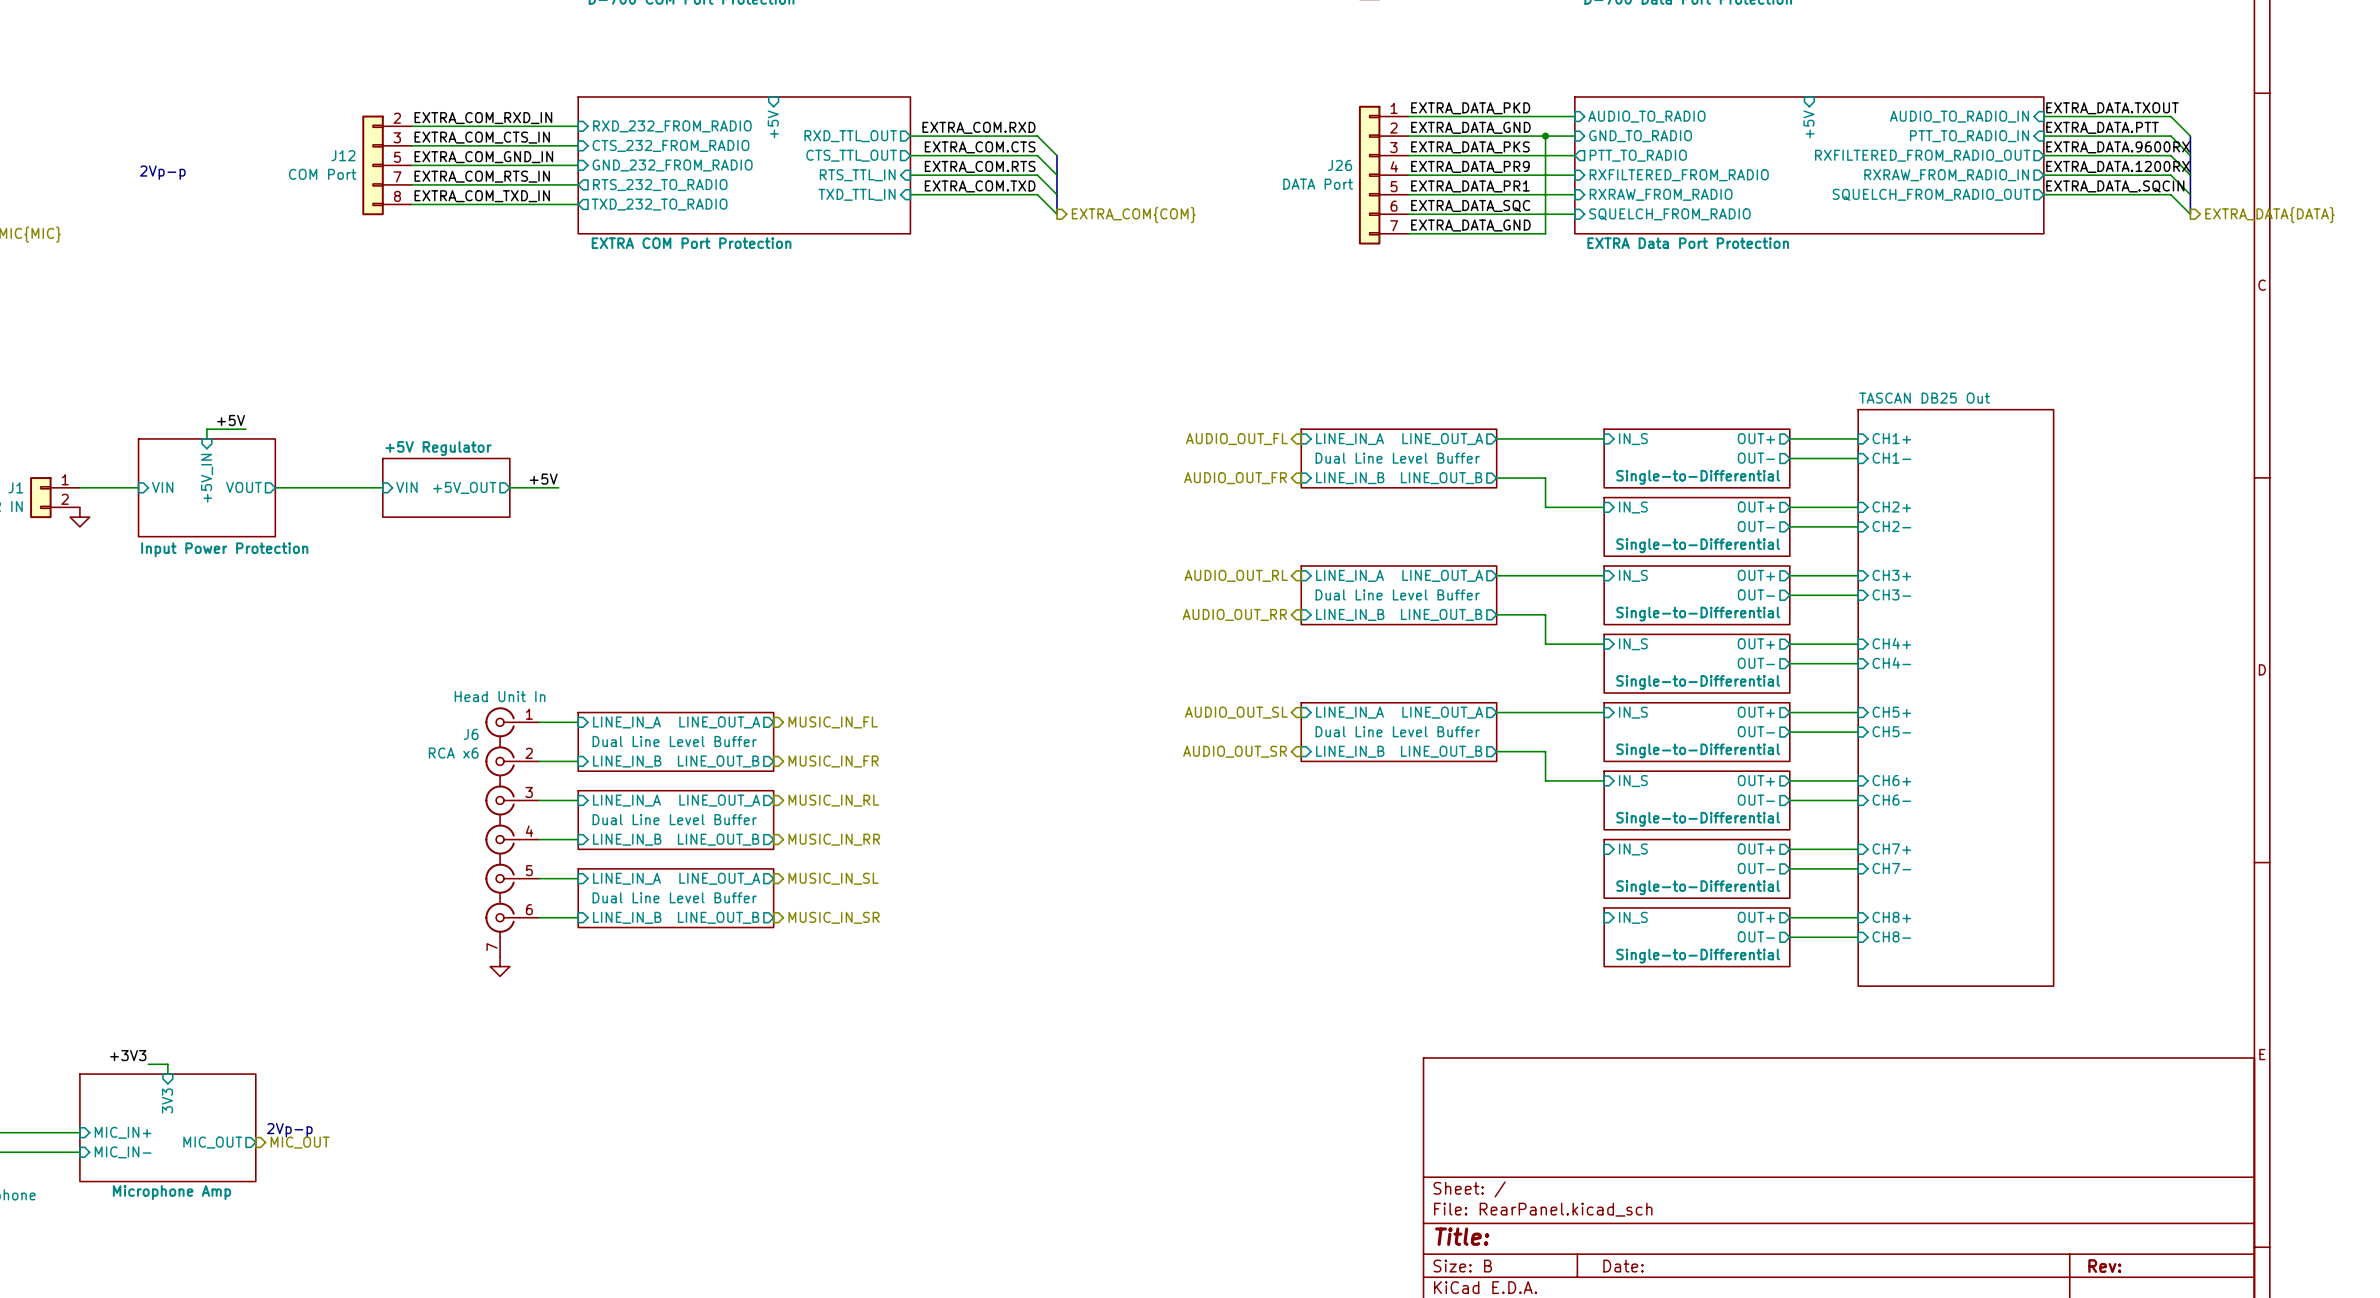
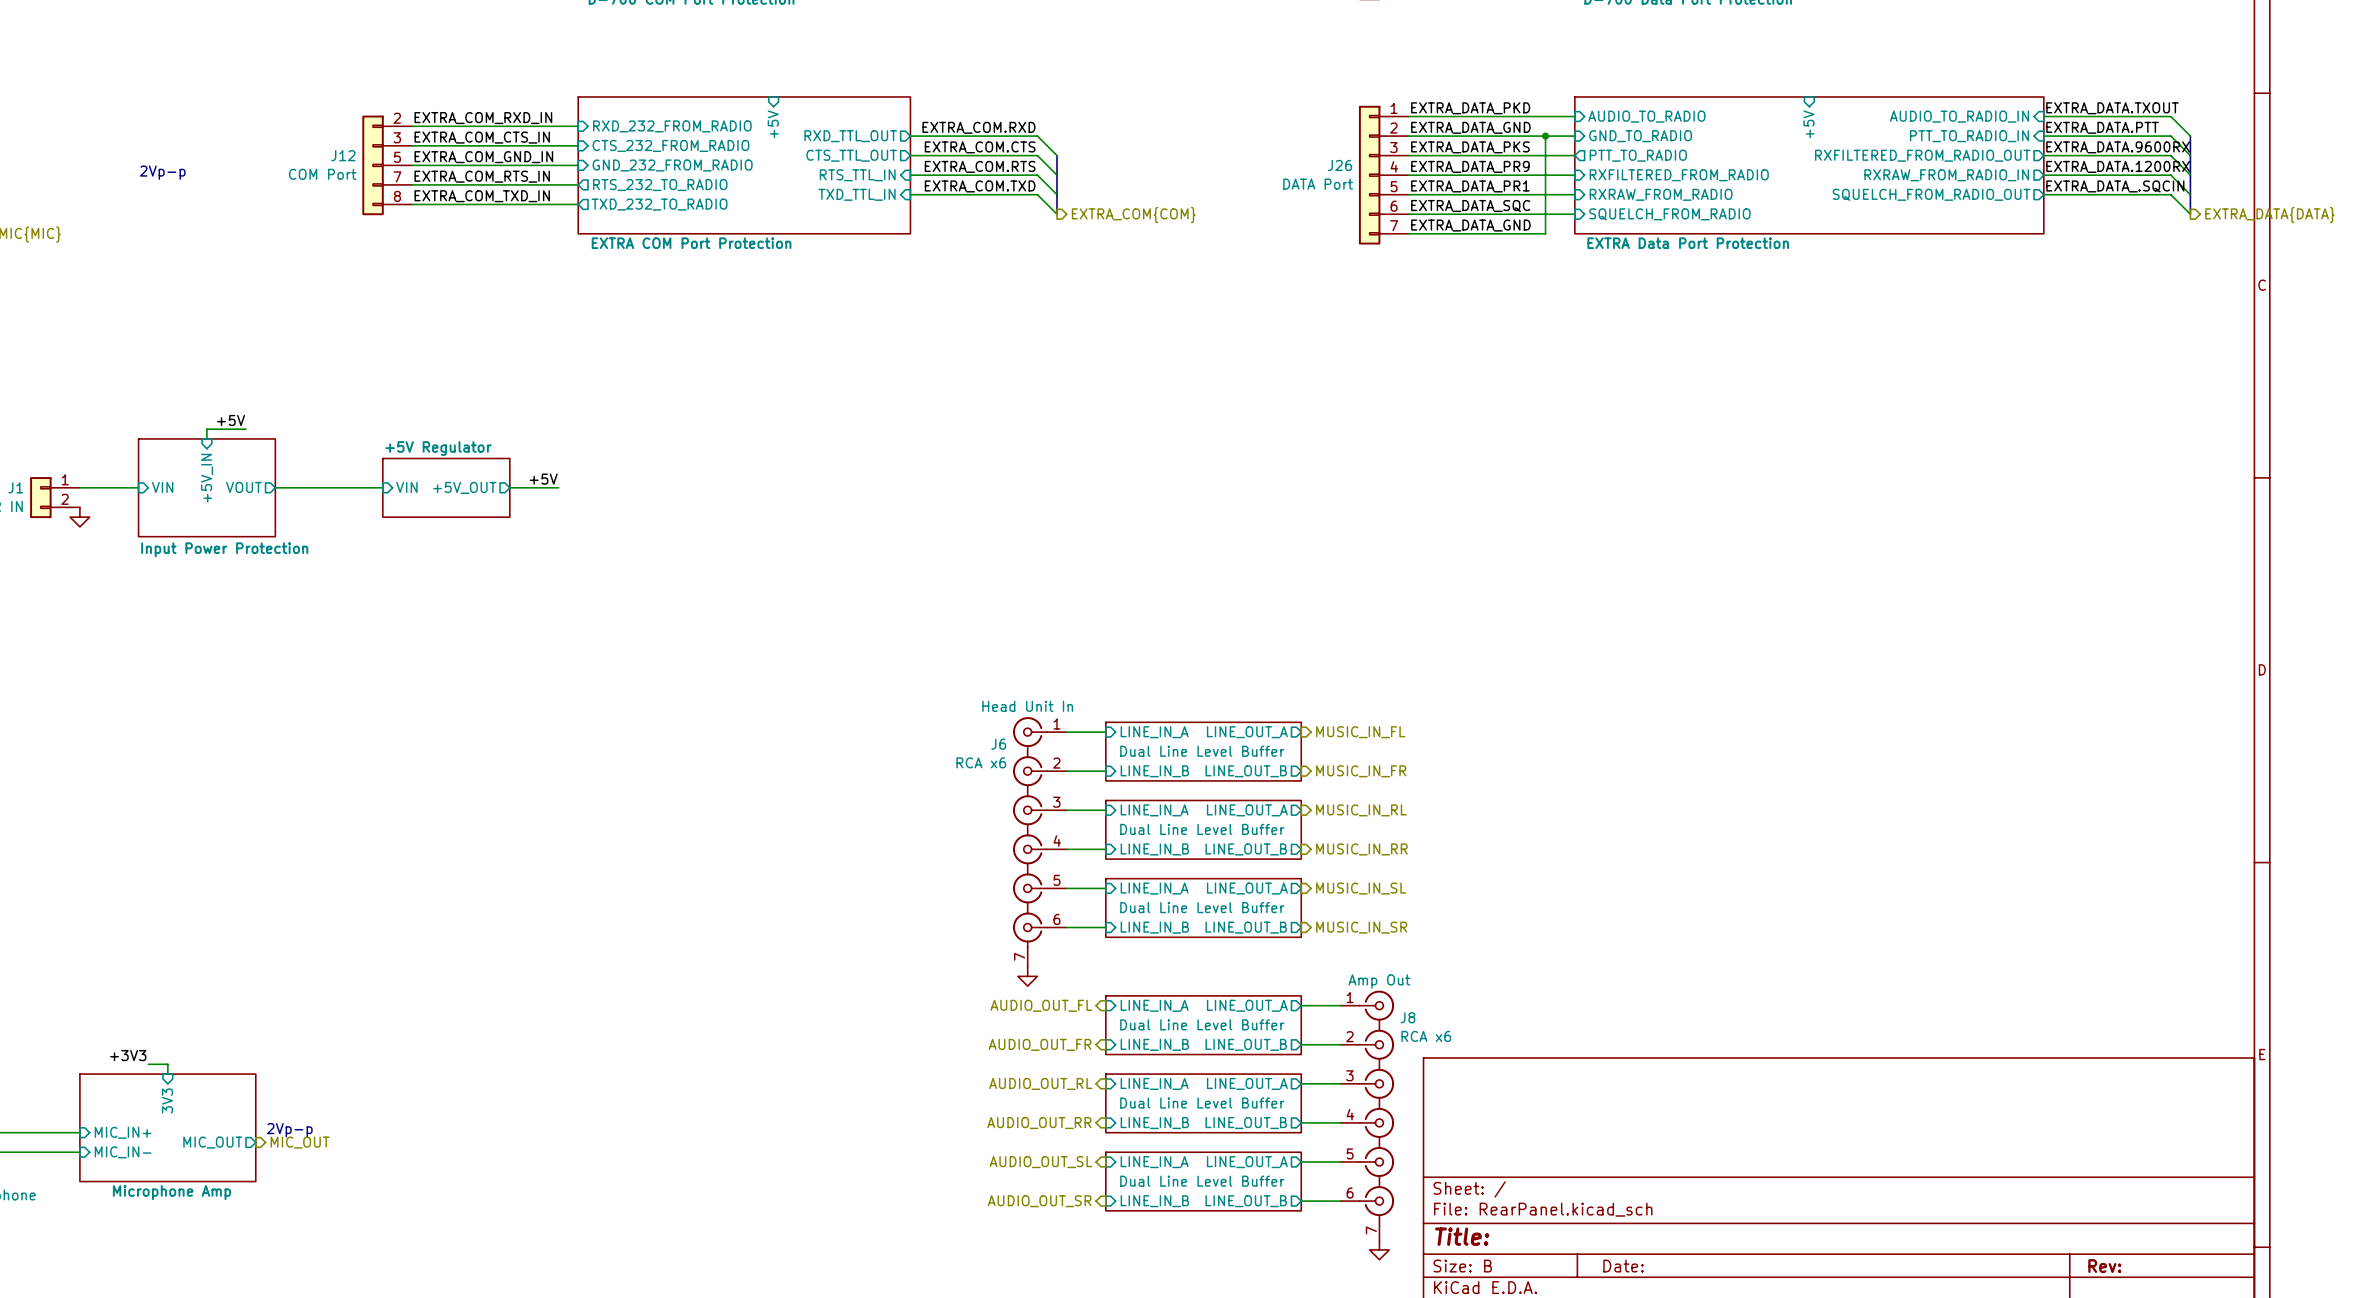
wire: (1496, 438) (1604, 438) -> none
sheet pin: OUT+ (1756, 438) -> none
wire: (1789, 438) (1858, 438) -> none
sheet pin: CH1+ (1891, 438) -> none
hierarchical label: AUDIO_OUT_FL (1236, 439) -> none
sheet pin: LINE_IN_A (1350, 439) -> none
sheet pin: LINE_OUT_A (1442, 439) -> none
sheet pin: IN_S (1633, 439) -> none
sheet Dual Line Level Buffer: (1398, 458) -> none
sheet Single-to-Differential: (1696, 458) -> none
sheet pin: OUT- (1756, 458) -> none
wire: (1789, 458) (1858, 458) -> none
sheet pin: CH1- (1891, 458) -> none
hierarchical label: AUDIO_OUT_FR (1235, 478) -> none
sheet pin: LINE_IN_B (1350, 478) -> none
sheet pin: LINE_OUT_B (1441, 478) -> none
wire: (1496, 478) (1545, 478) (1545, 507) (1604, 507) -> none
sheet pin: IN_S (1633, 507) -> none
sheet pin: OUT+ (1756, 507) -> none
wire: (1789, 507) (1858, 507) -> none
sheet pin: CH2+ (1891, 507) -> none
sheet Single-to-Differential: (1696, 526) -> none
sheet pin: OUT- (1756, 526) -> none
wire: (1789, 526) (1858, 526) -> none
sheet pin: CH2- (1891, 526) -> none
hierarchical label: AUDIO_OUT_RL (1236, 575) -> none
sheet pin: LINE_IN_A (1350, 575) -> none
sheet pin: LINE_OUT_A (1442, 575) -> none
wire: (1496, 575) (1604, 575) -> none
sheet pin: IN_S (1633, 575) -> none
sheet pin: OUT+ (1756, 575) -> none
wire: (1789, 575) (1858, 575) -> none
sheet pin: CH3+ (1891, 575) -> none
sheet pin: OUT- (1756, 594) -> none
sheet pin: CH3- (1891, 594) -> none
sheet Dual Line Level Buffer: (1398, 595) -> none
sheet Single-to-Differential: (1696, 595) -> none
wire: (1789, 595) (1858, 595) -> none
hierarchical label: AUDIO_OUT_RR (1234, 614) -> none
sheet pin: LINE_IN_B (1350, 614) -> none
sheet pin: LINE_OUT_B (1441, 614) -> none
wire: (1496, 614) (1545, 614) (1545, 644) (1604, 644) -> none
sheet pin: OUT+ (1756, 643) -> none
sheet pin: CH4+ (1891, 643) -> none
sheet pin: IN_S (1633, 644) -> none
wire: (1789, 644) (1858, 644) -> none
sheet Single-to-Differential: (1696, 663) -> none
sheet pin: OUT- (1756, 663) -> none
wire: (1789, 663) (1858, 663) -> none
sheet pin: CH4- (1891, 663) -> none
sheet TASCAN DB25 Out: (1955, 697) -> none
hierarchical label: AUDIO_OUT_SL (1236, 712) -> none
sheet pin: LINE_IN_A (1350, 712) -> none
sheet pin: LINE_OUT_A (1442, 712) -> none
wire: (1496, 712) (1604, 712) -> none
sheet pin: IN_S (1633, 712) -> none
sheet pin: OUT+ (1756, 712) -> none
wire: (1789, 712) (1858, 712) -> none
sheet pin: CH5+ (1891, 712) -> none
wire: (539, 722) (578, 722) -> none
sheet pin: LINE_IN_A (627, 722) -> none
sheet pin: LINE_OUT_A (719, 722) -> none
hierarchical label: MUSIC_IN_FL (833, 722) -> none
sheet pin: OUT- (1756, 731) -> none
sheet pin: CH5- (1891, 731) -> none
wire: none -> (1066, 732) (1105, 732)
sheet pin: none -> LINE_IN_A (1154, 732)
sheet pin: none -> LINE_OUT_A (1247, 732)
hierarchical label: none -> MUSIC_IN_FL (1360, 732)
sheet Dual Line Level Buffer: (1398, 732) -> none
sheet Single-to-Differential: (1696, 732) -> none
wire: (1789, 732) (1858, 732) -> none
sheet Dual Line Level Buffer: (675, 741) -> none
sheet Dual Line Level Buffer: none -> (1203, 751)
hierarchical label: AUDIO_OUT_SR (1235, 751) -> none
sheet pin: LINE_IN_B (1350, 751) -> none
sheet pin: LINE_OUT_B (1441, 751) -> none
wire: (1496, 751) (1545, 751) (1545, 780) (1604, 780) -> none
wire: (539, 761) (578, 761) -> none
sheet pin: LINE_IN_B (627, 761) -> none
sheet pin: LINE_OUT_B (718, 761) -> none
hierarchical label: MUSIC_IN_FR (833, 761) -> none
wire: none -> (1066, 771) (1105, 771)
sheet pin: none -> LINE_IN_B (1154, 771)
sheet pin: none -> LINE_OUT_B (1246, 771)
hierarchical label: none -> MUSIC_IN_FR (1361, 771)
sheet pin: OUT+ (1756, 780) -> none
wire: (1789, 780) (1858, 780) -> none
sheet pin: CH6+ (1891, 780) -> none
sheet pin: IN_S (1633, 781) -> none
wire: (539, 800) (578, 800) -> none
sheet pin: LINE_IN_A (627, 800) -> none
sheet pin: LINE_OUT_A (719, 800) -> none
hierarchical label: MUSIC_IN_RL (833, 800) -> none
sheet Single-to-Differential: (1696, 800) -> none
sheet pin: OUT- (1756, 800) -> none
wire: (1789, 800) (1858, 800) -> none
sheet pin: CH6- (1891, 800) -> none
wire: none -> (1066, 810) (1105, 810)
sheet pin: none -> LINE_IN_A (1154, 810)
sheet pin: none -> LINE_OUT_A (1247, 810)
hierarchical label: none -> MUSIC_IN_RL (1361, 810)
sheet Dual Line Level Buffer: (675, 820) -> none
sheet Dual Line Level Buffer: none -> (1203, 829)
J6 position: (512, 832) -> (1039, 841)
wire: (539, 839) (578, 839) -> none
sheet pin: LINE_IN_B (627, 839) -> none
sheet pin: LINE_OUT_B (718, 839) -> none
hierarchical label: MUSIC_IN_RR (834, 839) -> none
sheet pin: OUT+ (1756, 848) -> none
sheet pin: CH7+ (1891, 848) -> none
wire: none -> (1066, 849) (1105, 849)
sheet pin: none -> LINE_IN_B (1154, 849)
sheet pin: none -> LINE_OUT_B (1246, 849)
hierarchical label: none -> MUSIC_IN_RR (1361, 849)
sheet pin: IN_S (1633, 849) -> none
wire: (1789, 849) (1858, 849) -> none
sheet Single-to-Differential: (1696, 868) -> none
sheet pin: OUT- (1756, 868) -> none
wire: (1789, 868) (1858, 868) -> none
sheet pin: CH7- (1891, 868) -> none
wire: (539, 878) (578, 878) -> none
sheet pin: LINE_IN_A (627, 878) -> none
sheet pin: LINE_OUT_A (719, 878) -> none
hierarchical label: MUSIC_IN_SL (833, 878) -> none
wire: none -> (1066, 888) (1105, 888)
sheet pin: none -> LINE_IN_A (1154, 888)
sheet pin: none -> LINE_OUT_A (1247, 888)
hierarchical label: none -> MUSIC_IN_SL (1361, 888)
sheet Dual Line Level Buffer: (675, 898) -> none
sheet Dual Line Level Buffer: none -> (1203, 907)
wire: (539, 917) (578, 917) -> none
sheet pin: LINE_IN_B (627, 917) -> none
sheet pin: LINE_OUT_B (718, 917) -> none
hierarchical label: MUSIC_IN_SR (834, 917) -> none
sheet pin: IN_S (1633, 917) -> none
sheet pin: OUT+ (1756, 917) -> none
wire: (1789, 917) (1858, 917) -> none
sheet pin: CH8+ (1891, 917) -> none
wire: none -> (1066, 927) (1105, 927)
sheet pin: none -> LINE_IN_B (1154, 927)
sheet pin: none -> LINE_OUT_B (1246, 927)
hierarchical label: none -> MUSIC_IN_SR (1361, 927)
sheet pin: OUT- (1756, 936) -> none
sheet pin: CH8- (1891, 936) -> none
sheet Single-to-Differential: (1696, 937) -> none
wire: (1789, 937) (1858, 937) -> none
power symbol: (500, 966) -> none
power symbol: none -> (1027, 976)
hierarchical label: none -> AUDIO_OUT_FL (1041, 1005)
sheet pin: none -> LINE_IN_A (1154, 1005)
sheet pin: none -> LINE_OUT_A (1247, 1005)
wire: none -> (1301, 1005) (1340, 1005)
sheet Dual Line Level Buffer: none -> (1203, 1025)
hierarchical label: none -> AUDIO_OUT_FR (1040, 1044)
sheet pin: none -> LINE_IN_B (1154, 1044)
sheet pin: none -> LINE_OUT_B (1246, 1044)
wire: none -> (1301, 1044) (1340, 1044)
hierarchical label: none -> AUDIO_OUT_RL (1040, 1083)
sheet pin: none -> LINE_IN_A (1154, 1083)
sheet pin: none -> LINE_OUT_A (1247, 1083)
wire: none -> (1301, 1083) (1340, 1083)
sheet Dual Line Level Buffer: none -> (1203, 1103)
J8: none -> RCA x6 (1367, 1115)
wire: none -> (1301, 1122) (1340, 1122)
hierarchical label: none -> AUDIO_OUT_RR (1039, 1123)
sheet pin: none -> LINE_IN_B (1154, 1123)
sheet pin: none -> LINE_OUT_B (1246, 1123)
hierarchical label: none -> AUDIO_OUT_SL (1041, 1162)
sheet pin: none -> LINE_IN_A (1154, 1162)
sheet pin: none -> LINE_OUT_A (1247, 1162)
wire: none -> (1301, 1162) (1340, 1162)
sheet Dual Line Level Buffer: none -> (1203, 1181)
hierarchical label: none -> AUDIO_OUT_SR (1039, 1201)
sheet pin: none -> LINE_IN_B (1154, 1201)
sheet pin: none -> LINE_OUT_B (1246, 1201)
wire: none -> (1301, 1201) (1340, 1201)
power symbol: none -> (1379, 1249)

